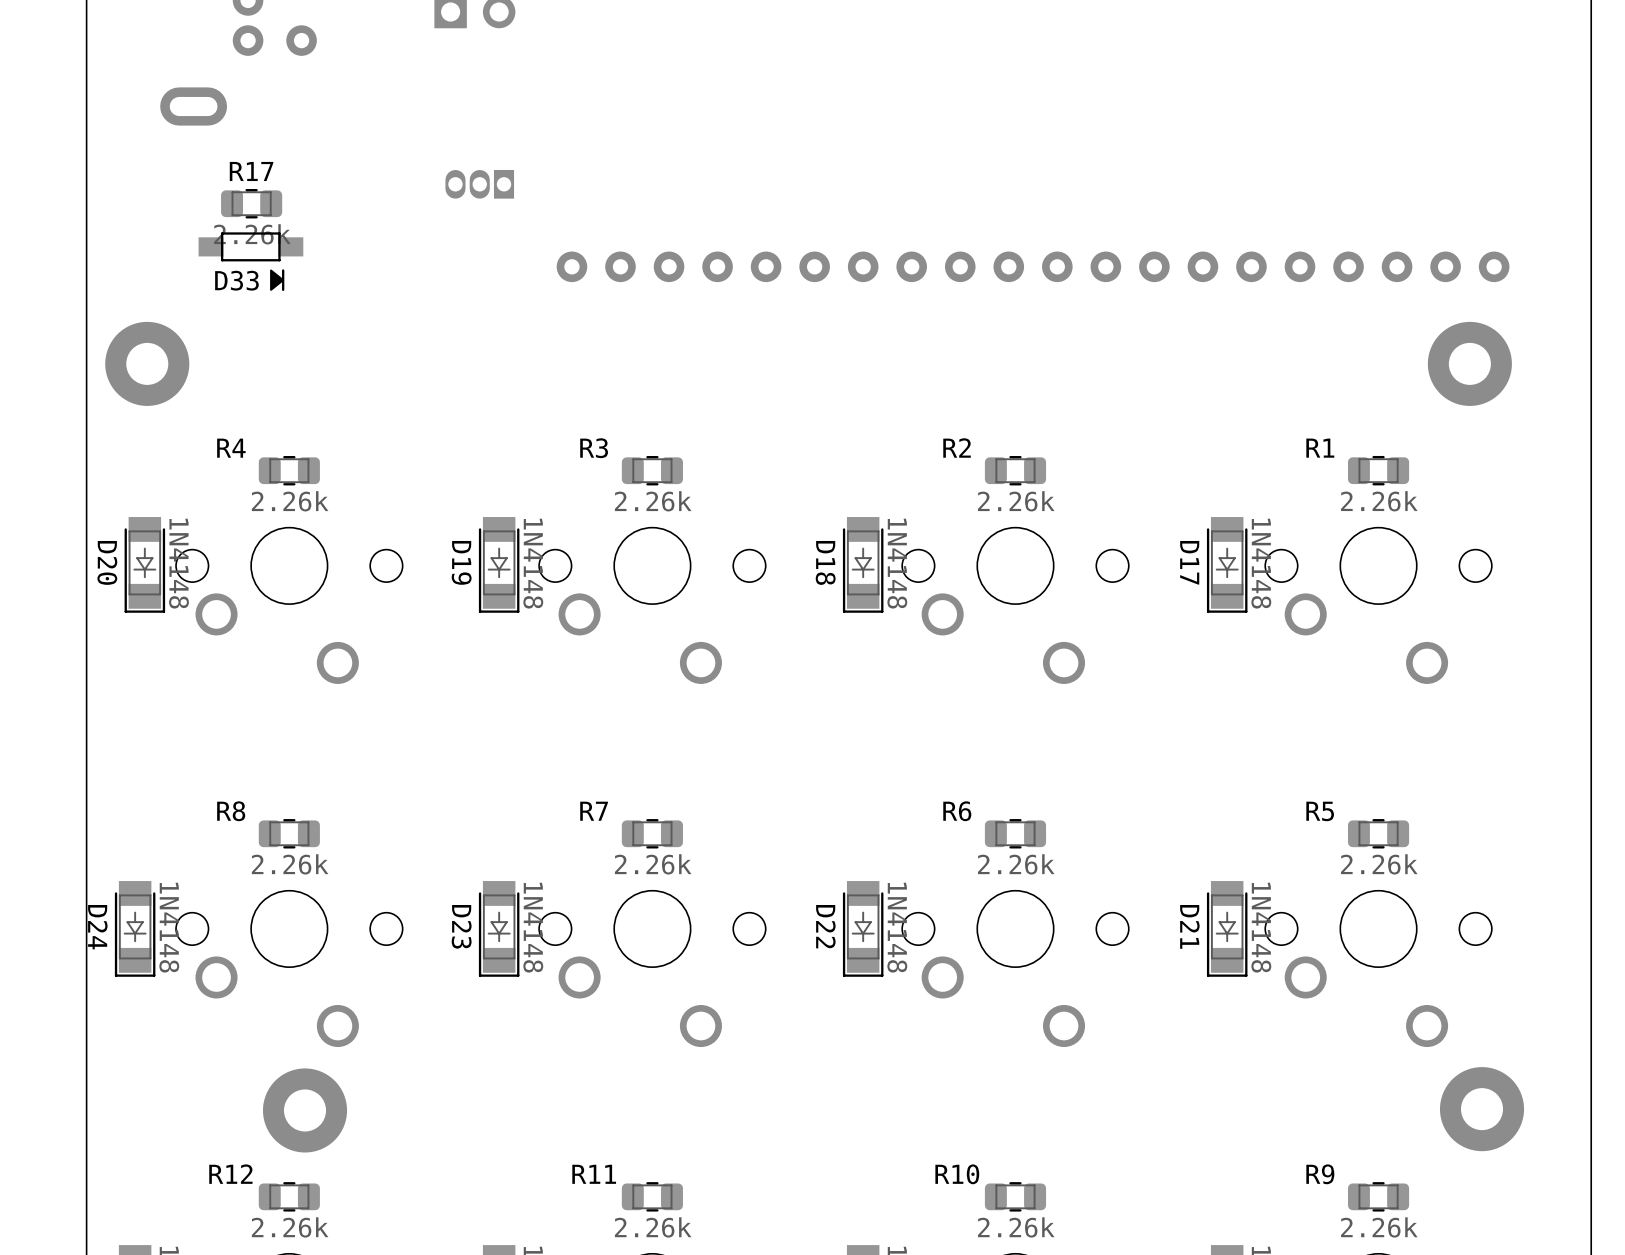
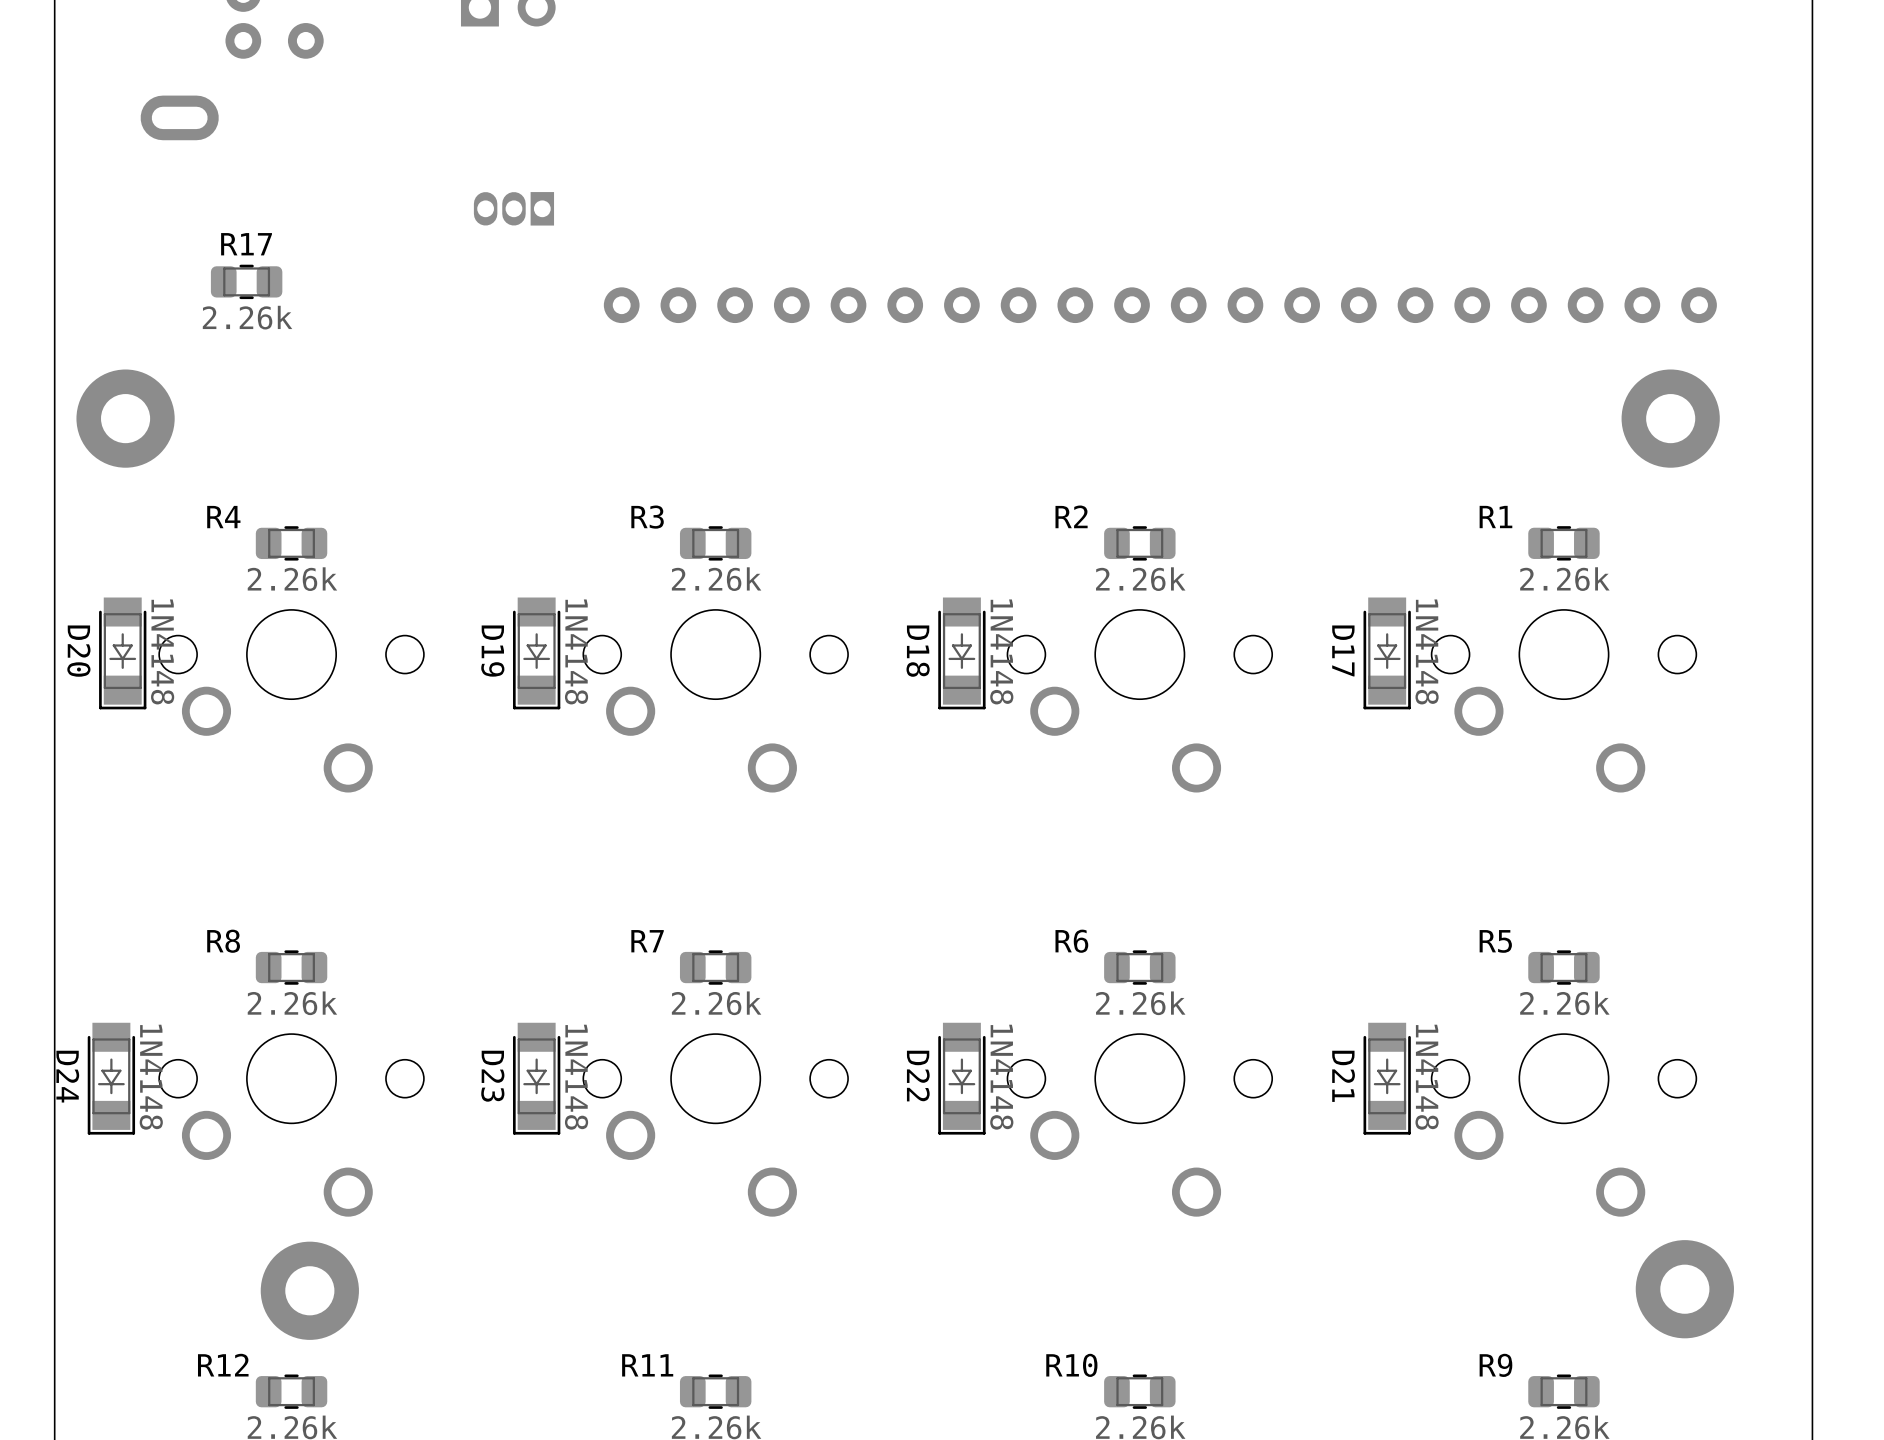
R17 position: (251, 203) -> (246, 281)
D33: (250, 246) -> none
drawing: [270, 269, 285, 291] -> none
line: (283, 270) (283, 289) -> none

